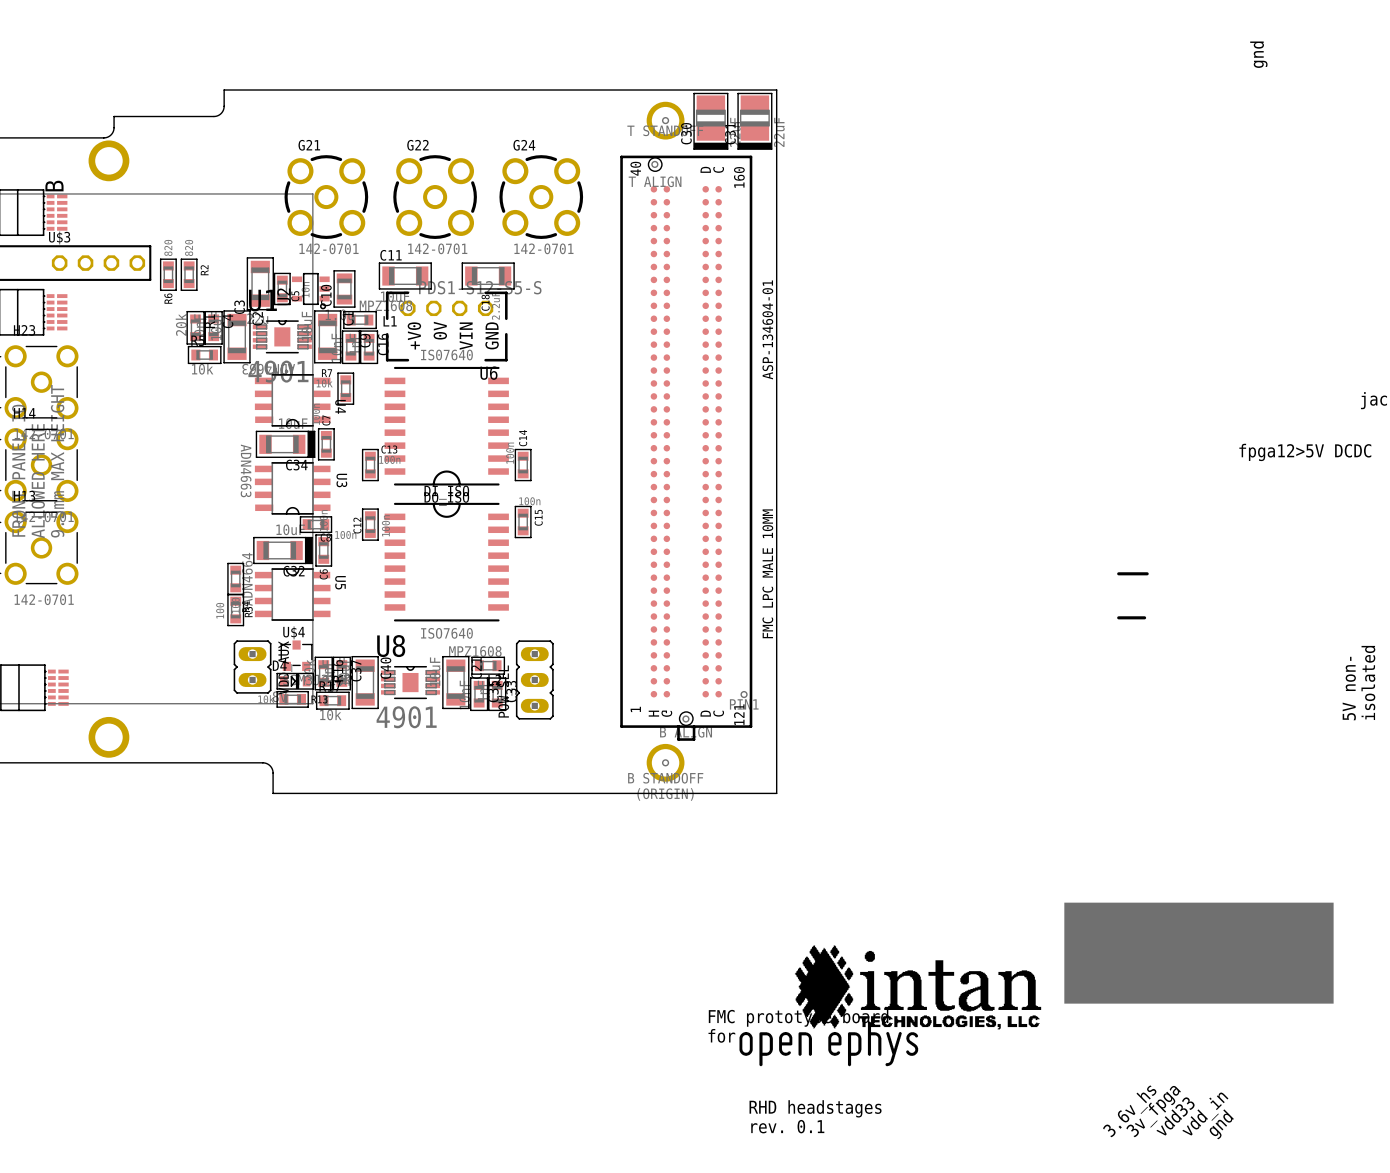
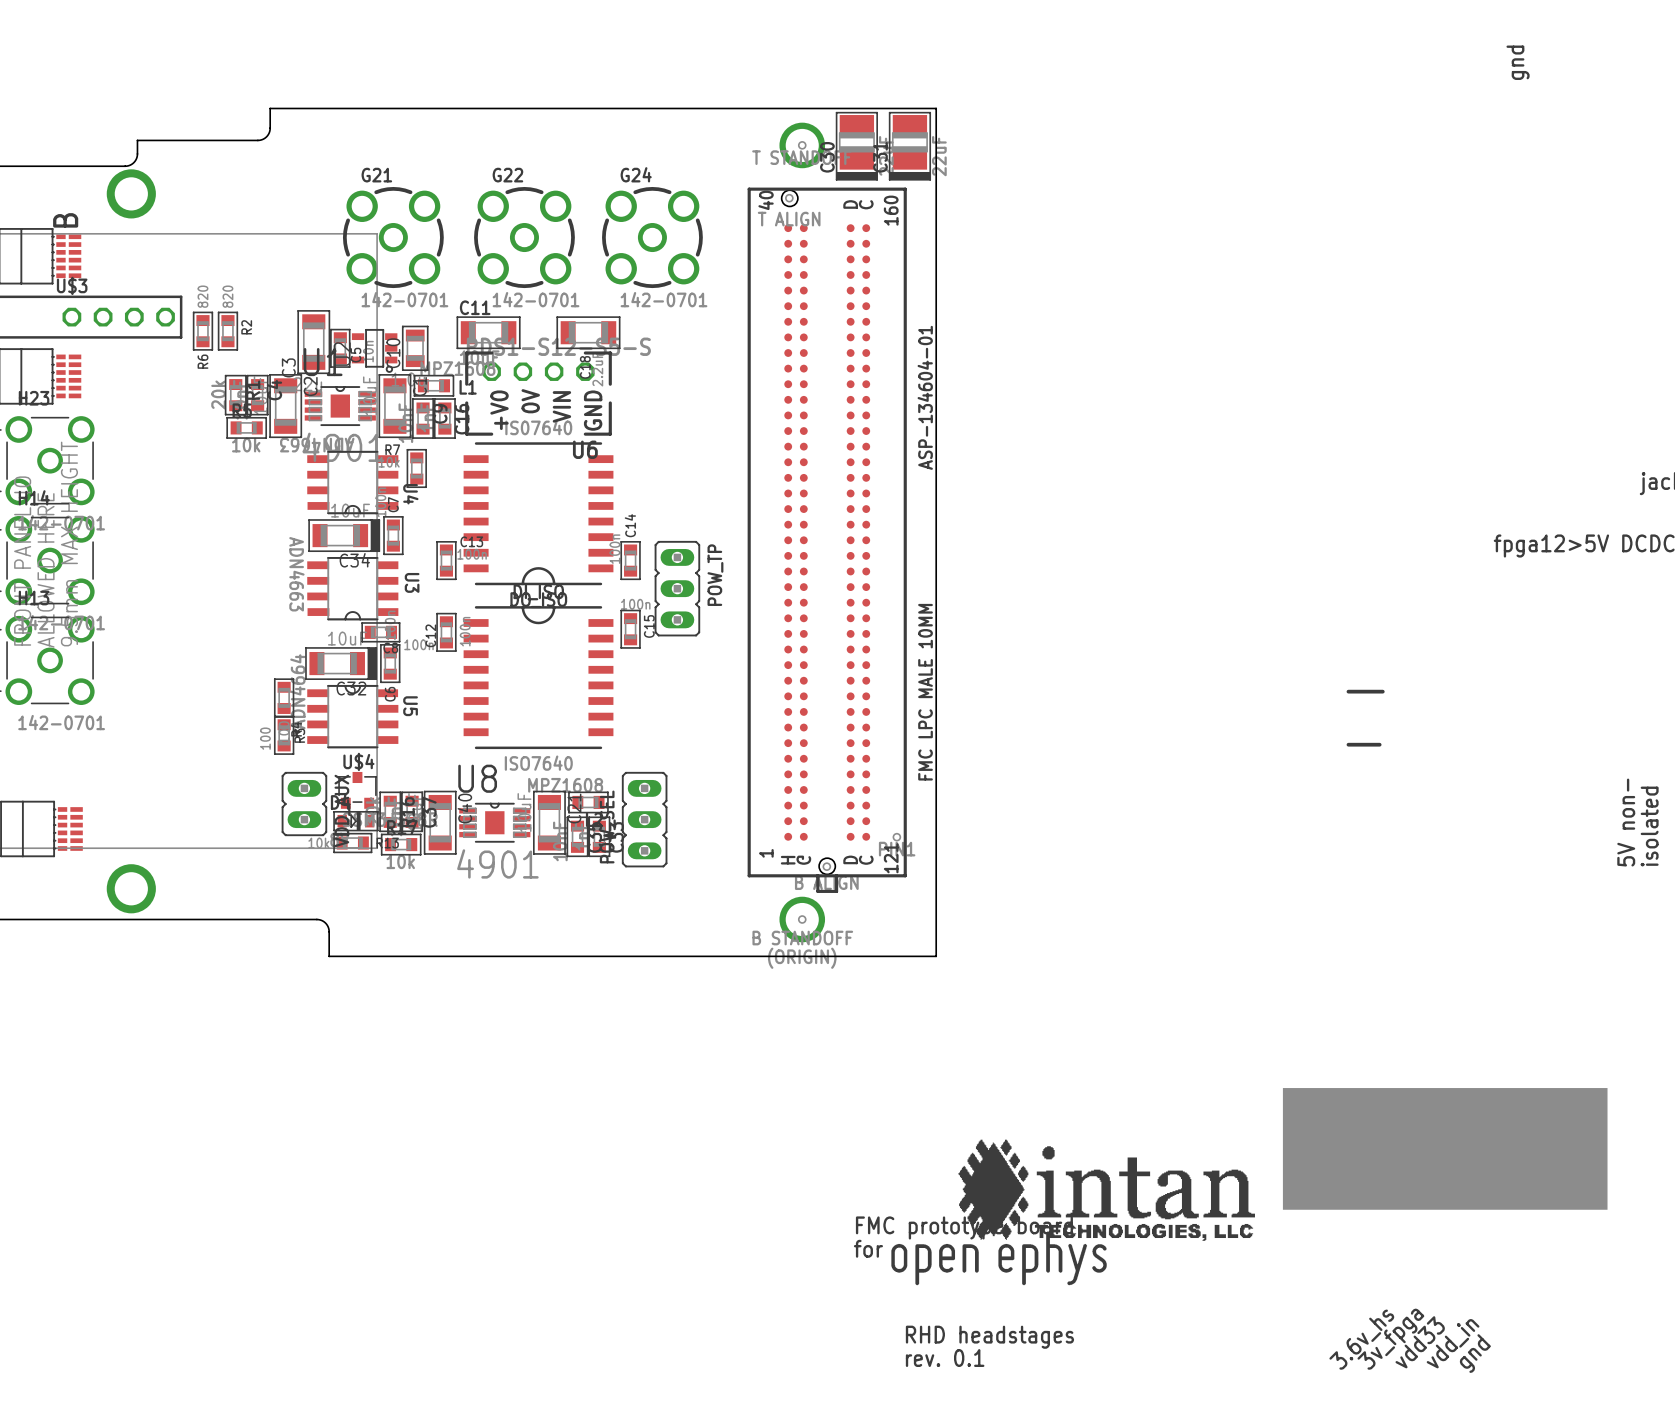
POW_TP: none -> (677, 588)

